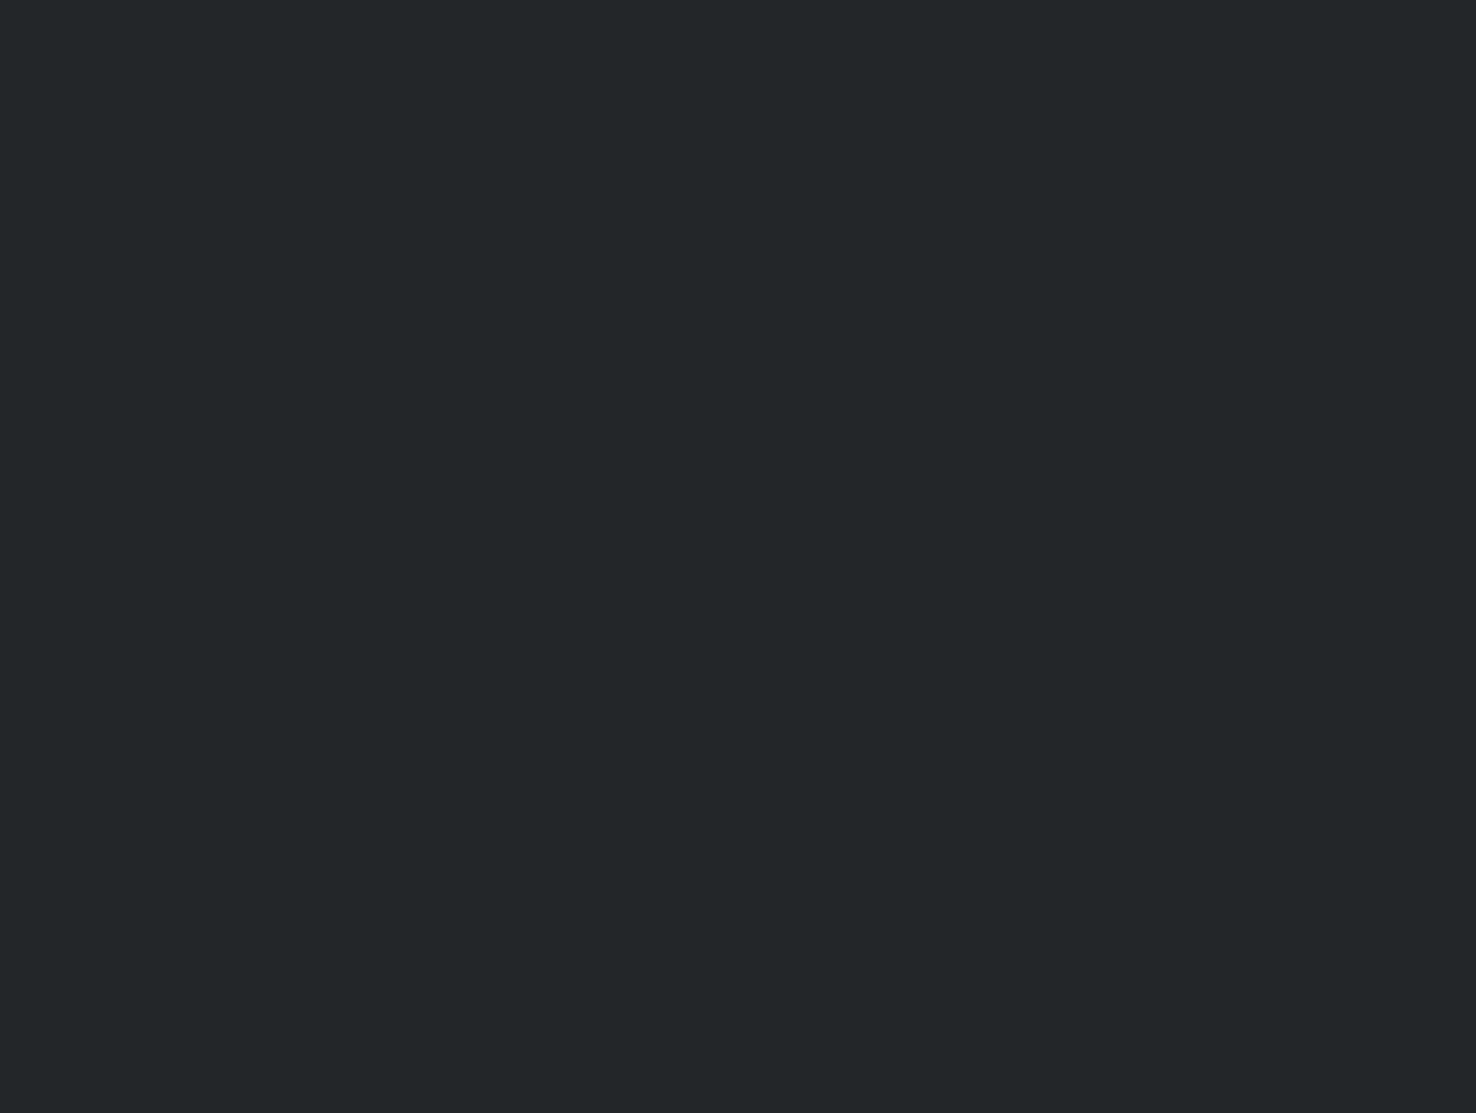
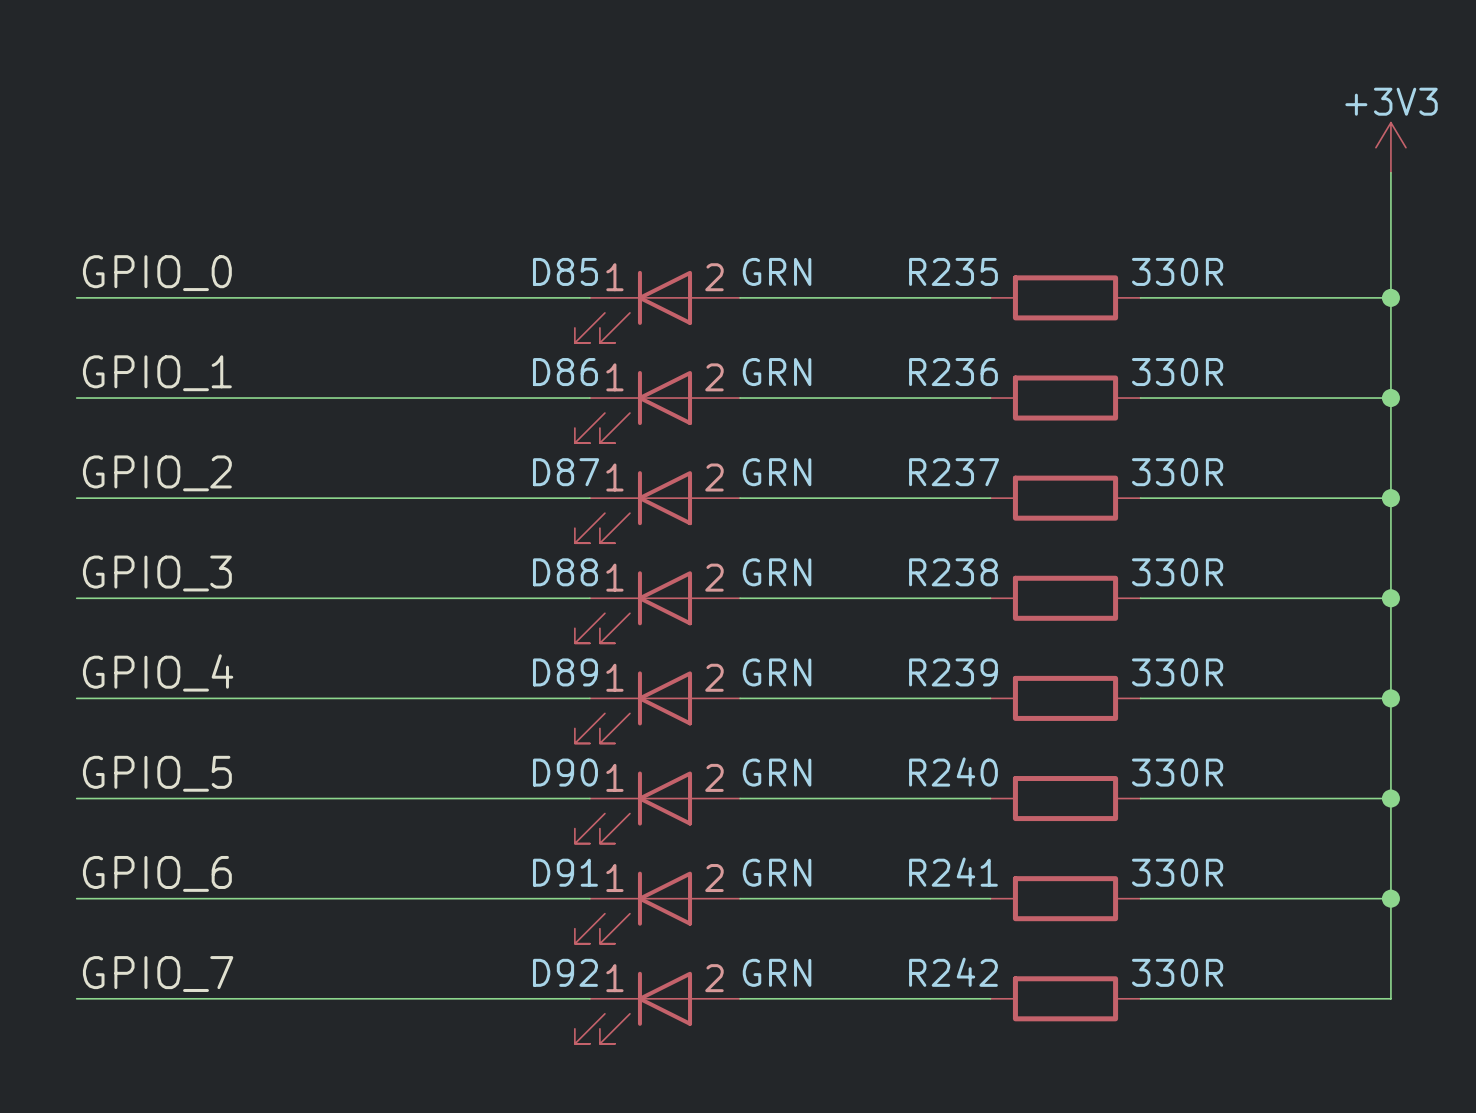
power symbol: none -> +3V3 (1390, 147)
wire: none -> (1390, 172) (1390, 998) (1140, 998)
label: none -> GPIO_0 (157, 273)
wire: none -> (76, 297) (589, 297)
wire: none -> (740, 297) (990, 297)
R235: none -> 330R (1065, 297)
wire: none -> (1140, 297) (1390, 297)
junction: none -> (1390, 297)
D85: none -> GRN (657, 306)
label: none -> GPIO_1 (157, 373)
wire: none -> (76, 398) (589, 398)
wire: none -> (740, 398) (990, 398)
R236: none -> 330R (1065, 398)
wire: none -> (1140, 398) (1390, 398)
junction: none -> (1390, 398)
D86: none -> GRN (657, 407)
label: none -> GPIO_2 (157, 473)
wire: none -> (76, 498) (589, 498)
wire: none -> (740, 498) (990, 498)
R237: none -> 330R (1065, 498)
wire: none -> (1140, 498) (1390, 498)
junction: none -> (1390, 498)
D87: none -> GRN (657, 507)
label: none -> GPIO_3 (157, 573)
wire: none -> (76, 598) (589, 598)
wire: none -> (740, 598) (990, 598)
R238: none -> 330R (1065, 598)
wire: none -> (1140, 598) (1390, 598)
junction: none -> (1390, 598)
D88: none -> GRN (657, 607)
label: none -> GPIO_4 (158, 672)
wire: none -> (76, 698) (589, 698)
wire: none -> (740, 698) (990, 698)
R239: none -> 330R (1065, 698)
wire: none -> (1140, 698) (1390, 698)
junction: none -> (1390, 698)
D89: none -> GRN (657, 707)
label: none -> GPIO_5 (157, 773)
wire: none -> (76, 798) (589, 798)
wire: none -> (740, 798) (990, 798)
R240: none -> 330R (1065, 798)
wire: none -> (1140, 798) (1390, 798)
junction: none -> (1390, 798)
D90: none -> GRN (657, 807)
label: none -> GPIO_6 (157, 873)
wire: none -> (76, 898) (589, 898)
wire: none -> (740, 898) (990, 898)
R241: none -> 330R (1065, 898)
wire: none -> (1140, 898) (1390, 898)
junction: none -> (1390, 898)
D91: none -> GRN (657, 907)
label: none -> GPIO_7 (158, 974)
wire: none -> (76, 998) (589, 998)
wire: none -> (740, 998) (990, 998)
R242: none -> 330R (1065, 998)
D92: none -> GRN (657, 1007)

